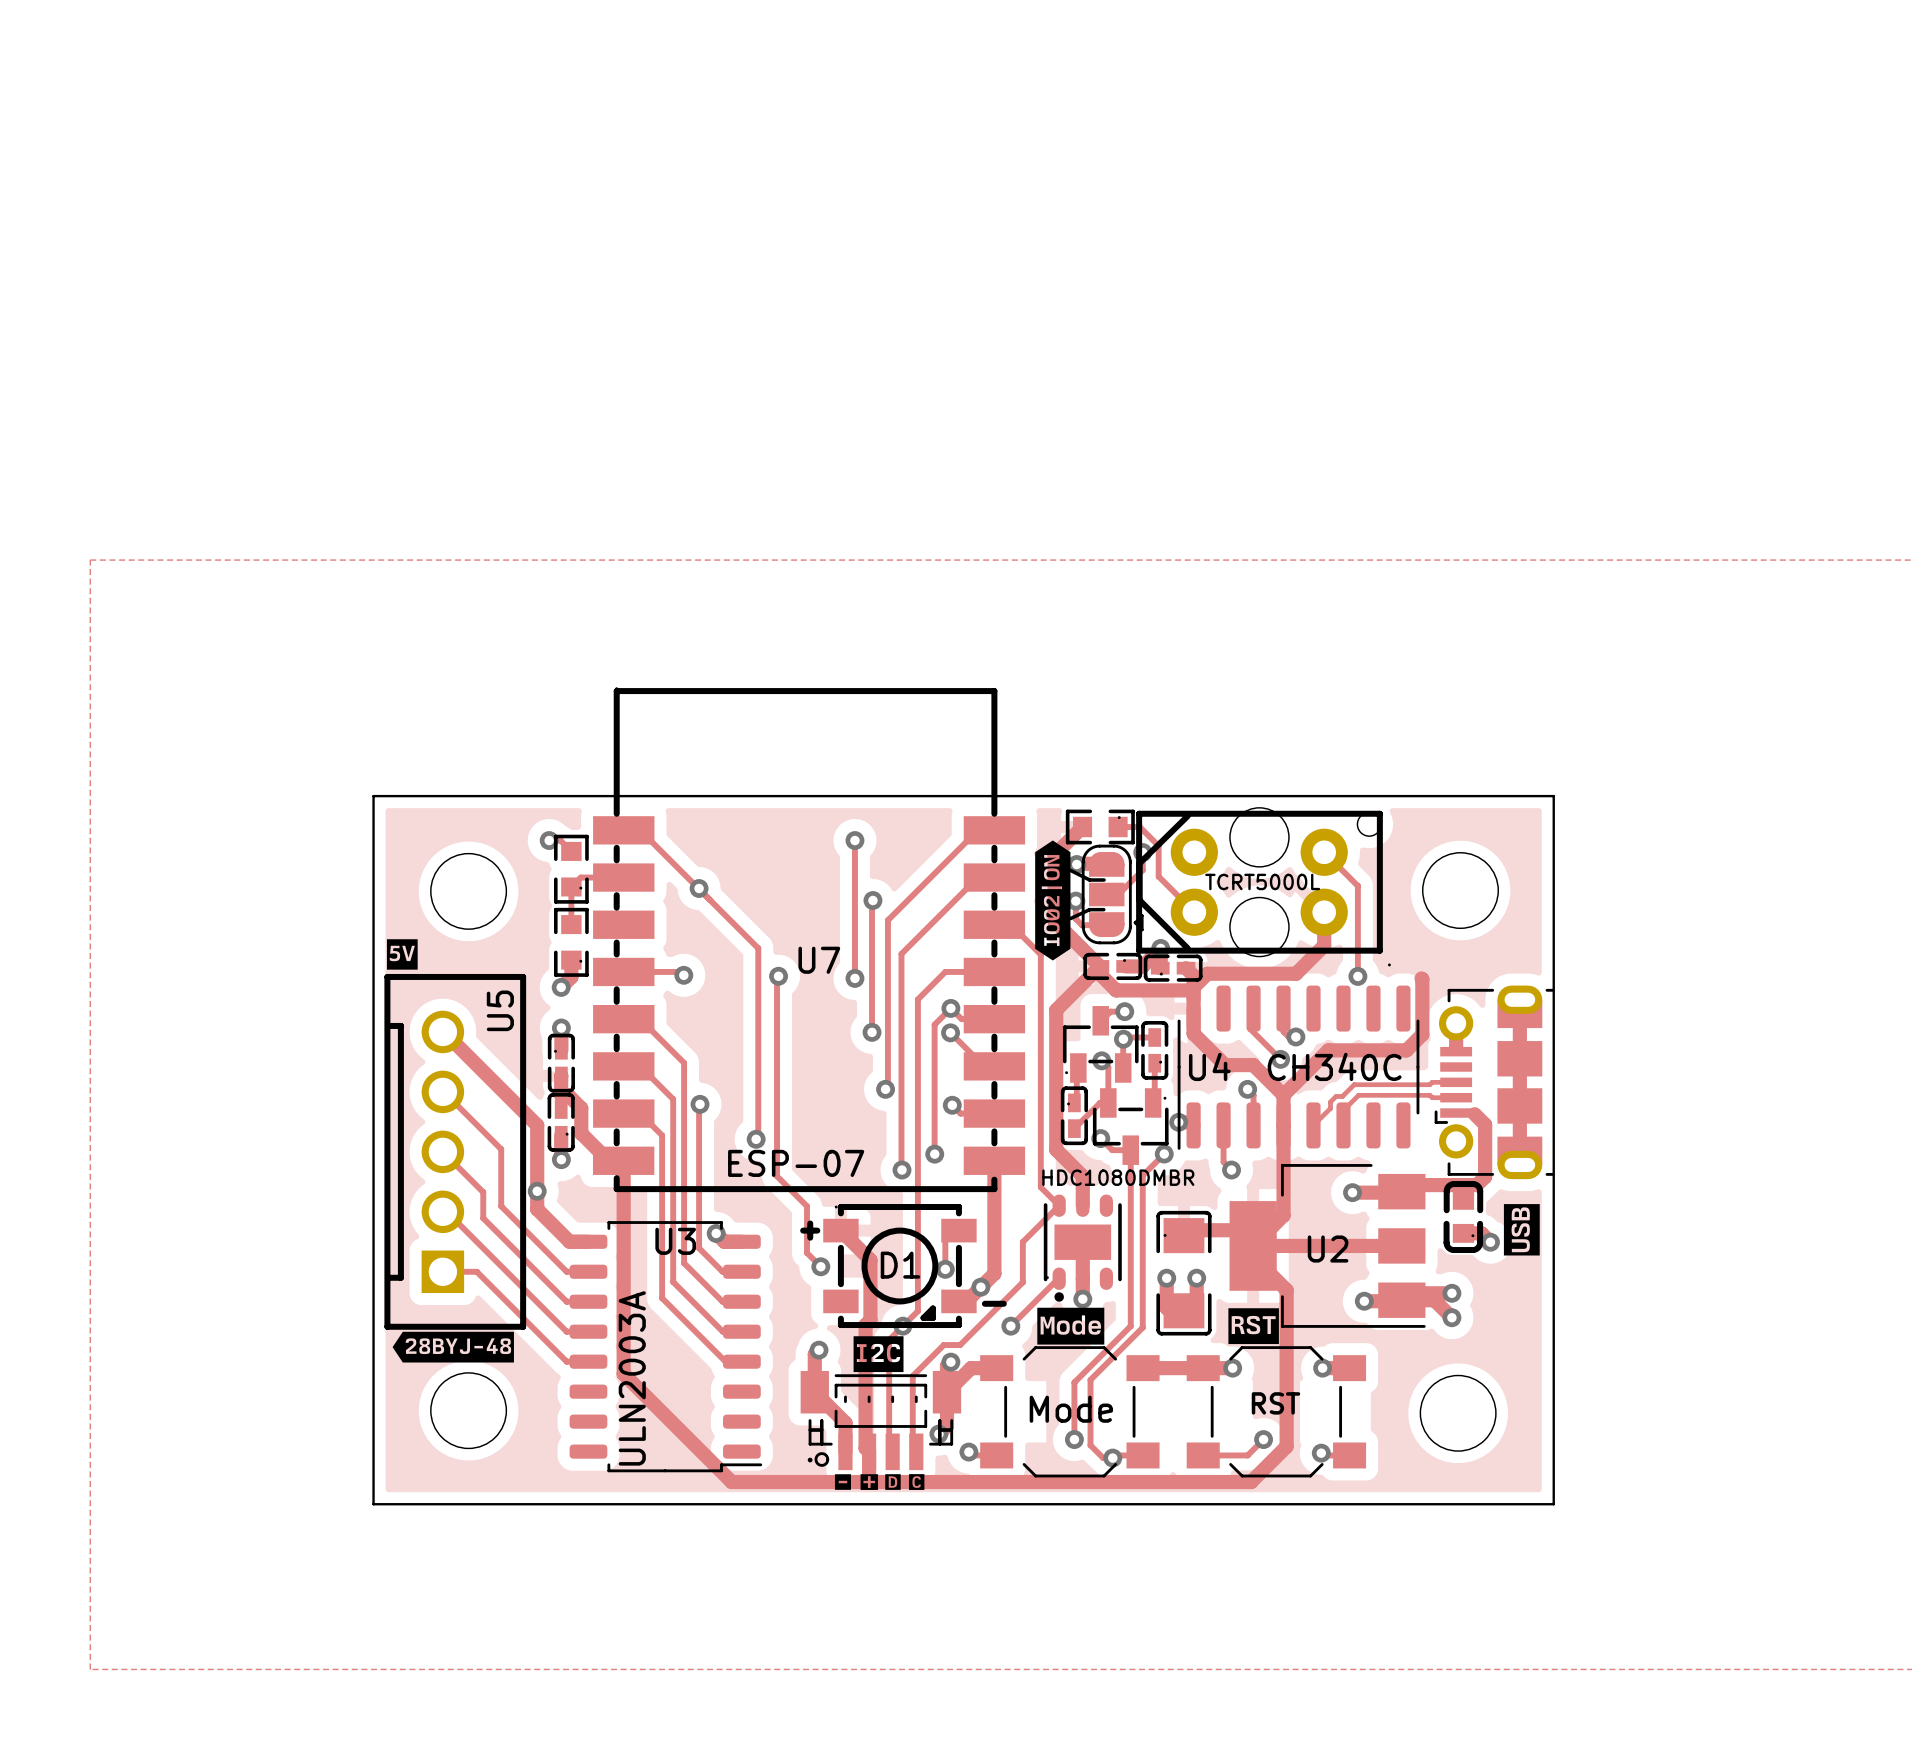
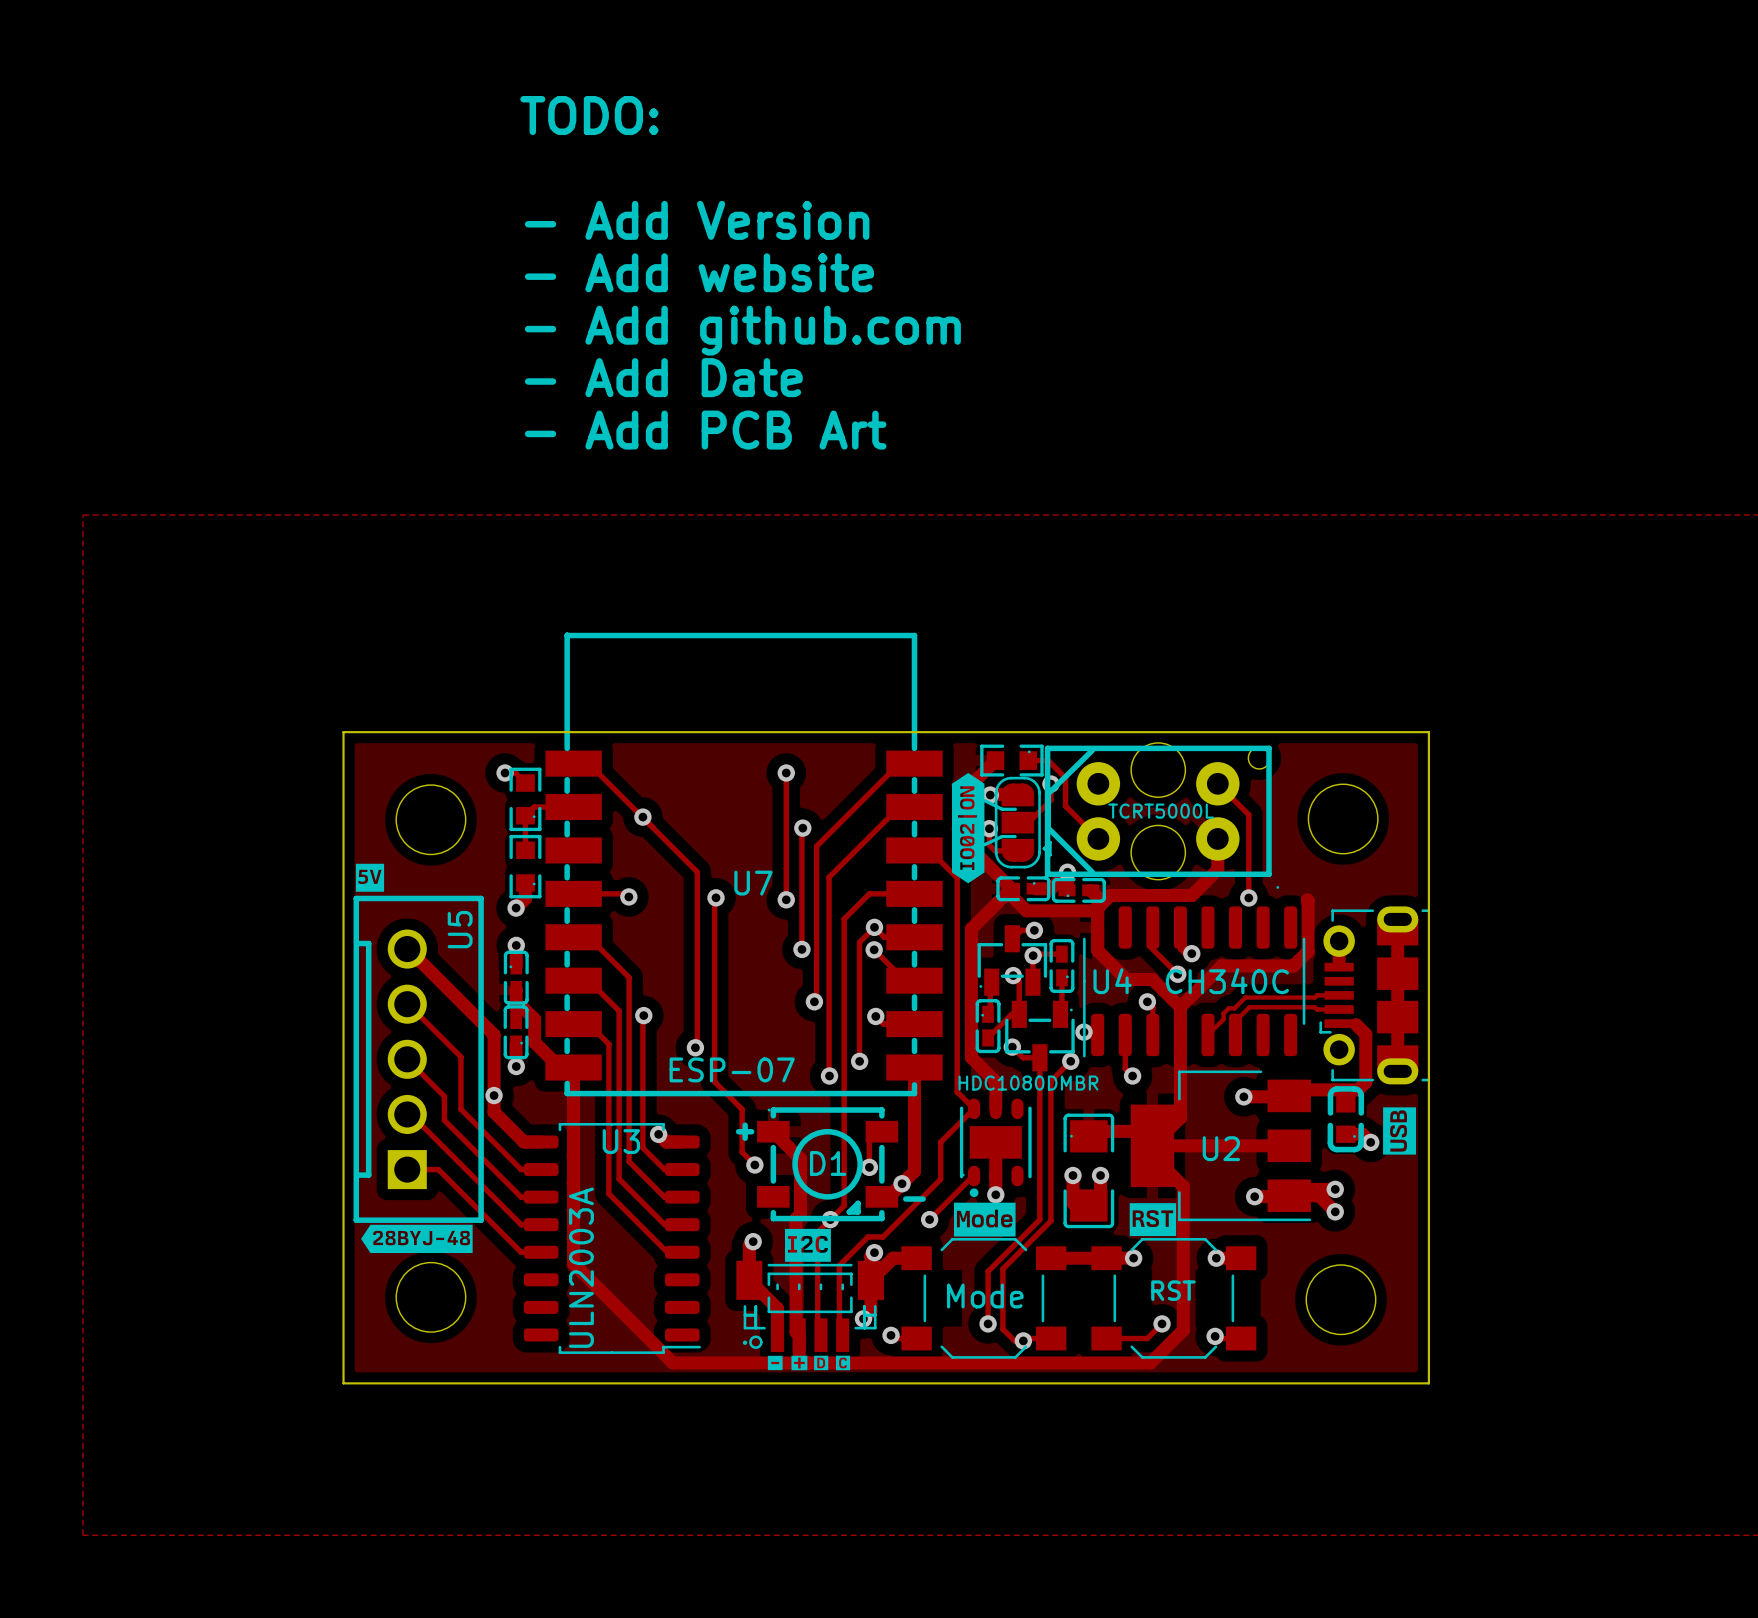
text: none -> TODO: (589, 115)
text: none -> - Add Version (697, 220)
text: none -> - Add website (699, 272)
text: none -> - Add github.com (742, 330)
text: none -> - Add Date (663, 377)
text: none -> - Add PCB Art (705, 430)

